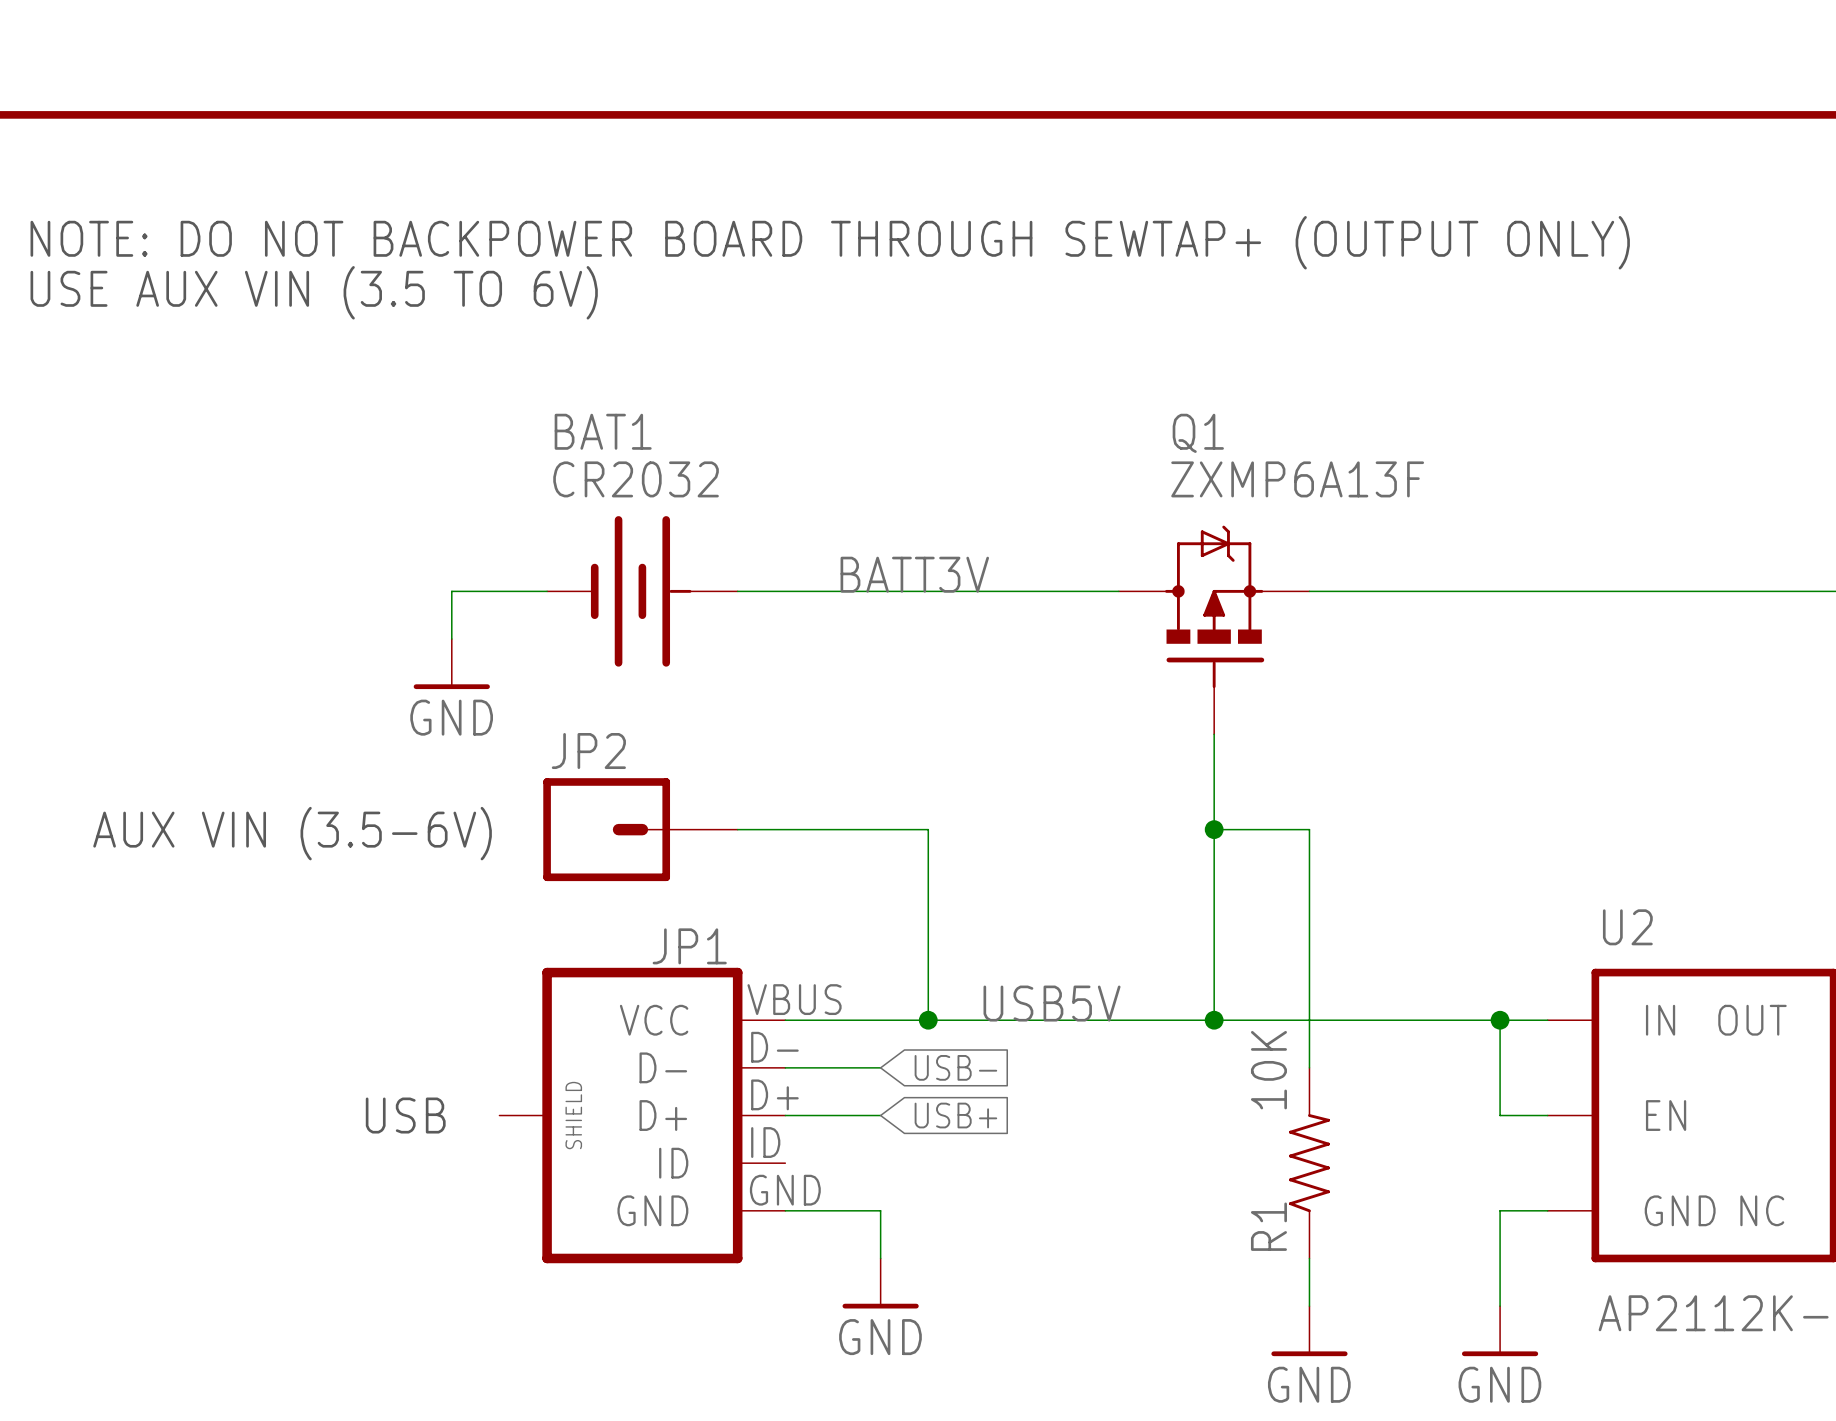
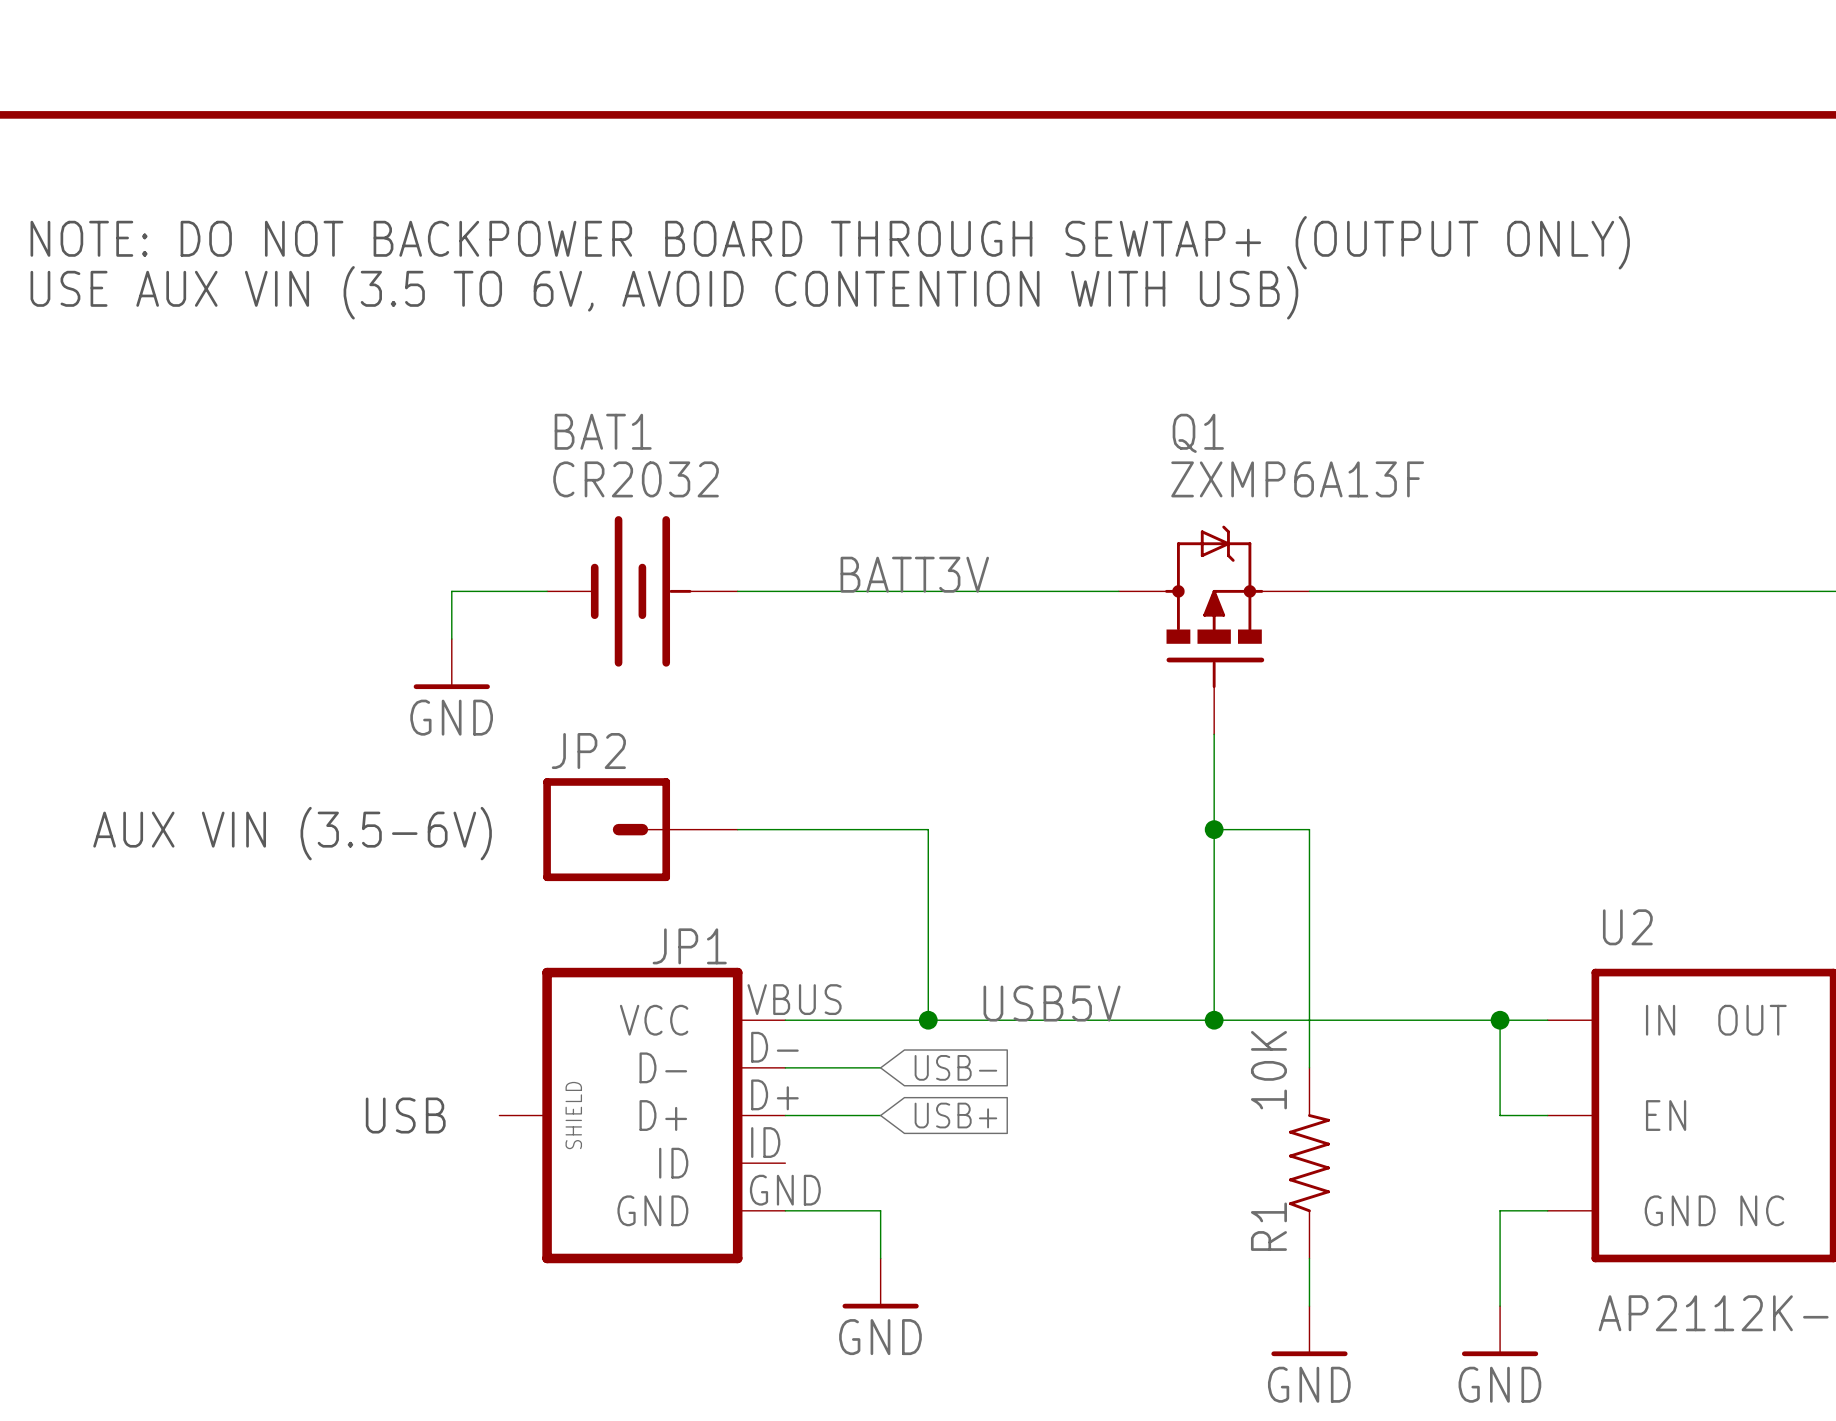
text: USE AUX VIN (3.5 TO 6V) (314, 292) -> USE AUX VIN (3.5 TO 6V, AVOID CONTENTION WITH USB) (664, 292)

